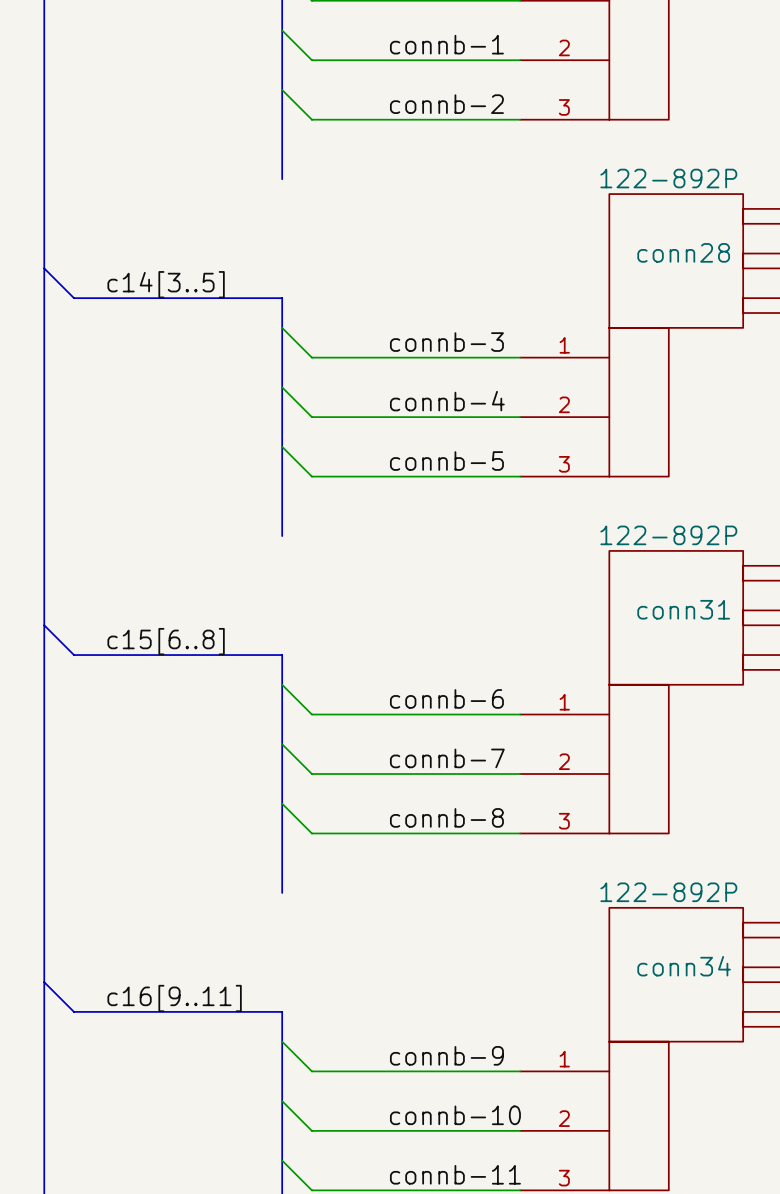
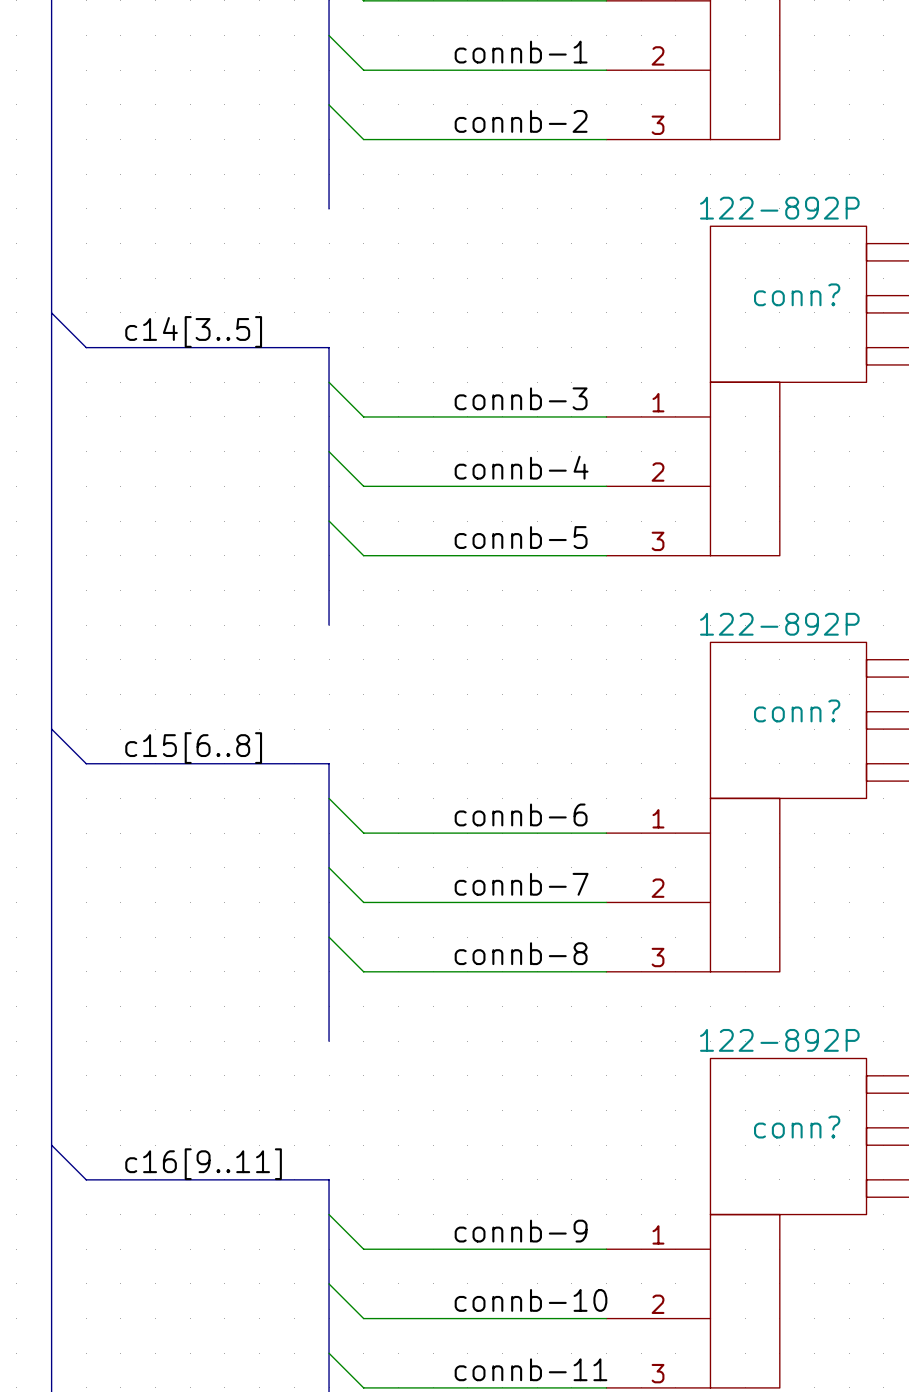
conn28 name: conn28 (683, 252) -> conn? (797, 294)
conn31 name: conn31 (683, 609) -> conn? (797, 710)
conn34 name: conn34 (684, 966) -> conn? (797, 1127)

